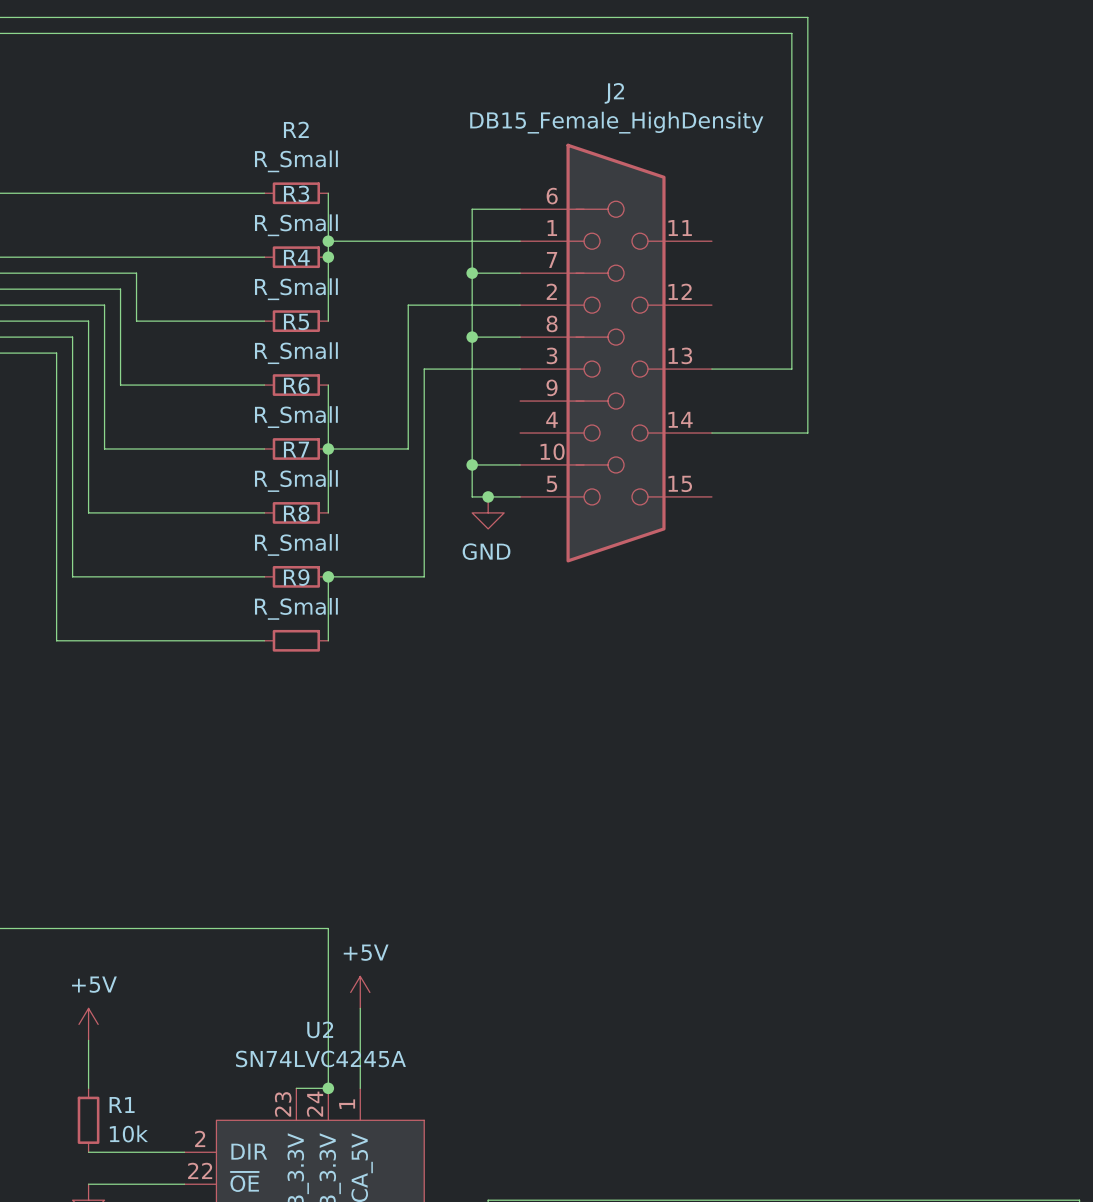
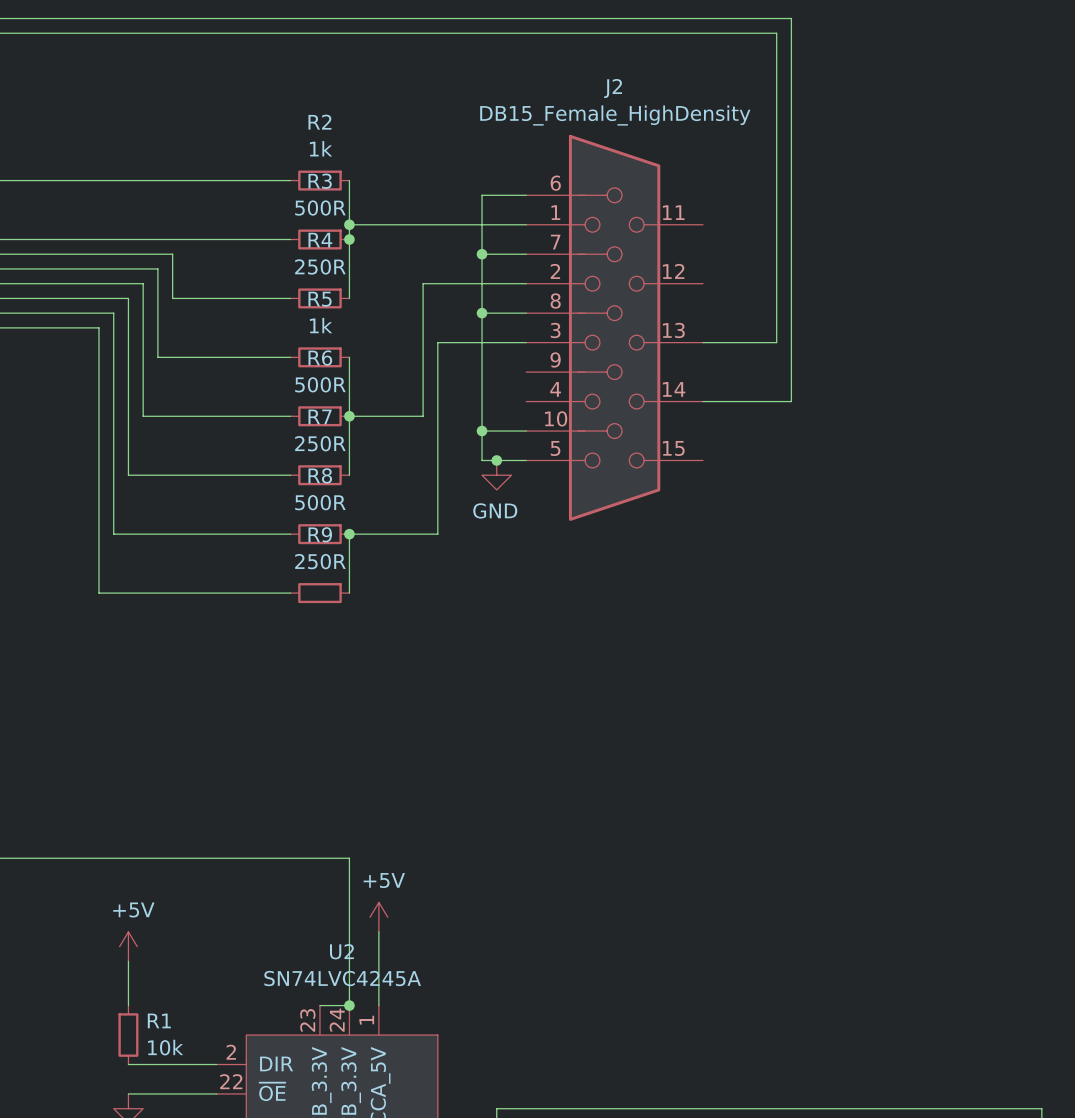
R2 value: R_Small (296, 161) -> 1k (321, 148)
R3 value: R_Small (296, 225) -> 500R (320, 208)
R4 value: R_Small (296, 289) -> 250R (320, 266)
R5 value: R_Small (296, 353) -> 1k (321, 325)
R6 value: R_Small (296, 417) -> 500R (320, 384)
R7 value: R_Small (296, 481) -> 250R (320, 443)
R8 value: R_Small (296, 544) -> 500R (320, 502)
R9 value: R_Small (296, 608) -> 250R (320, 561)

